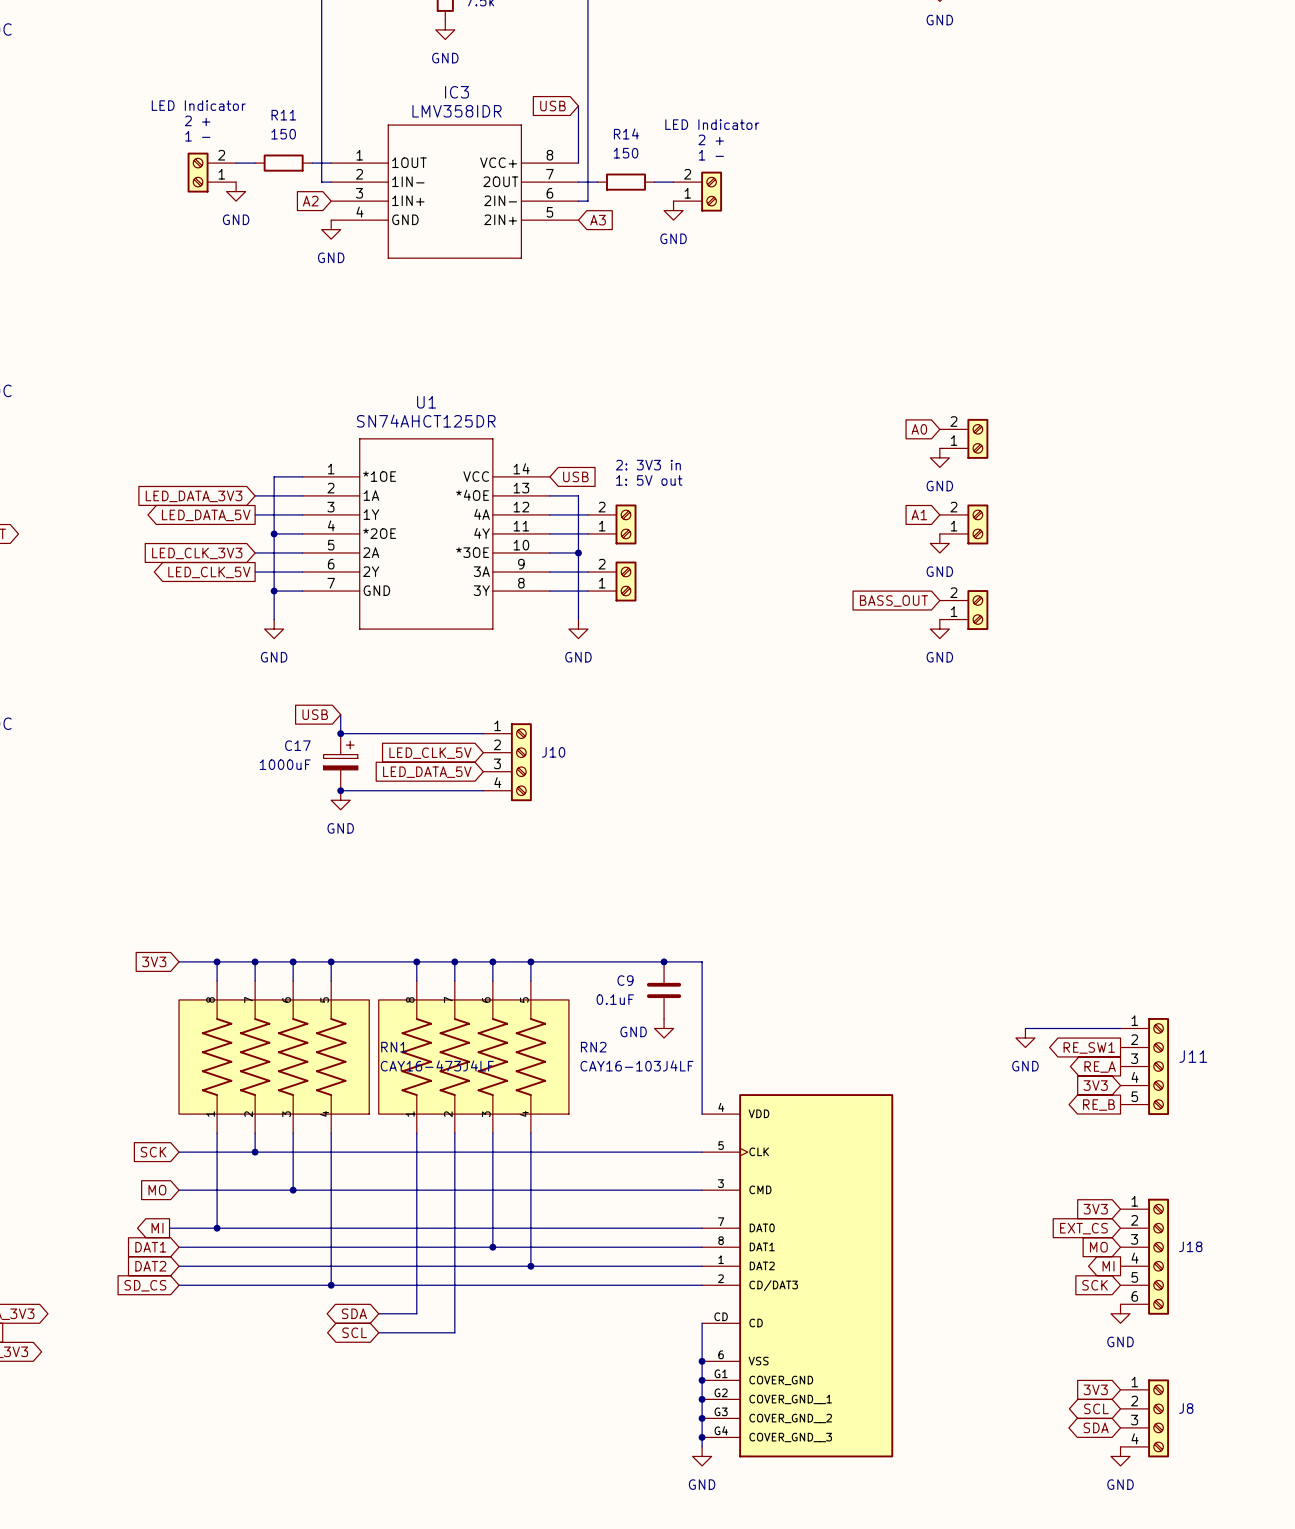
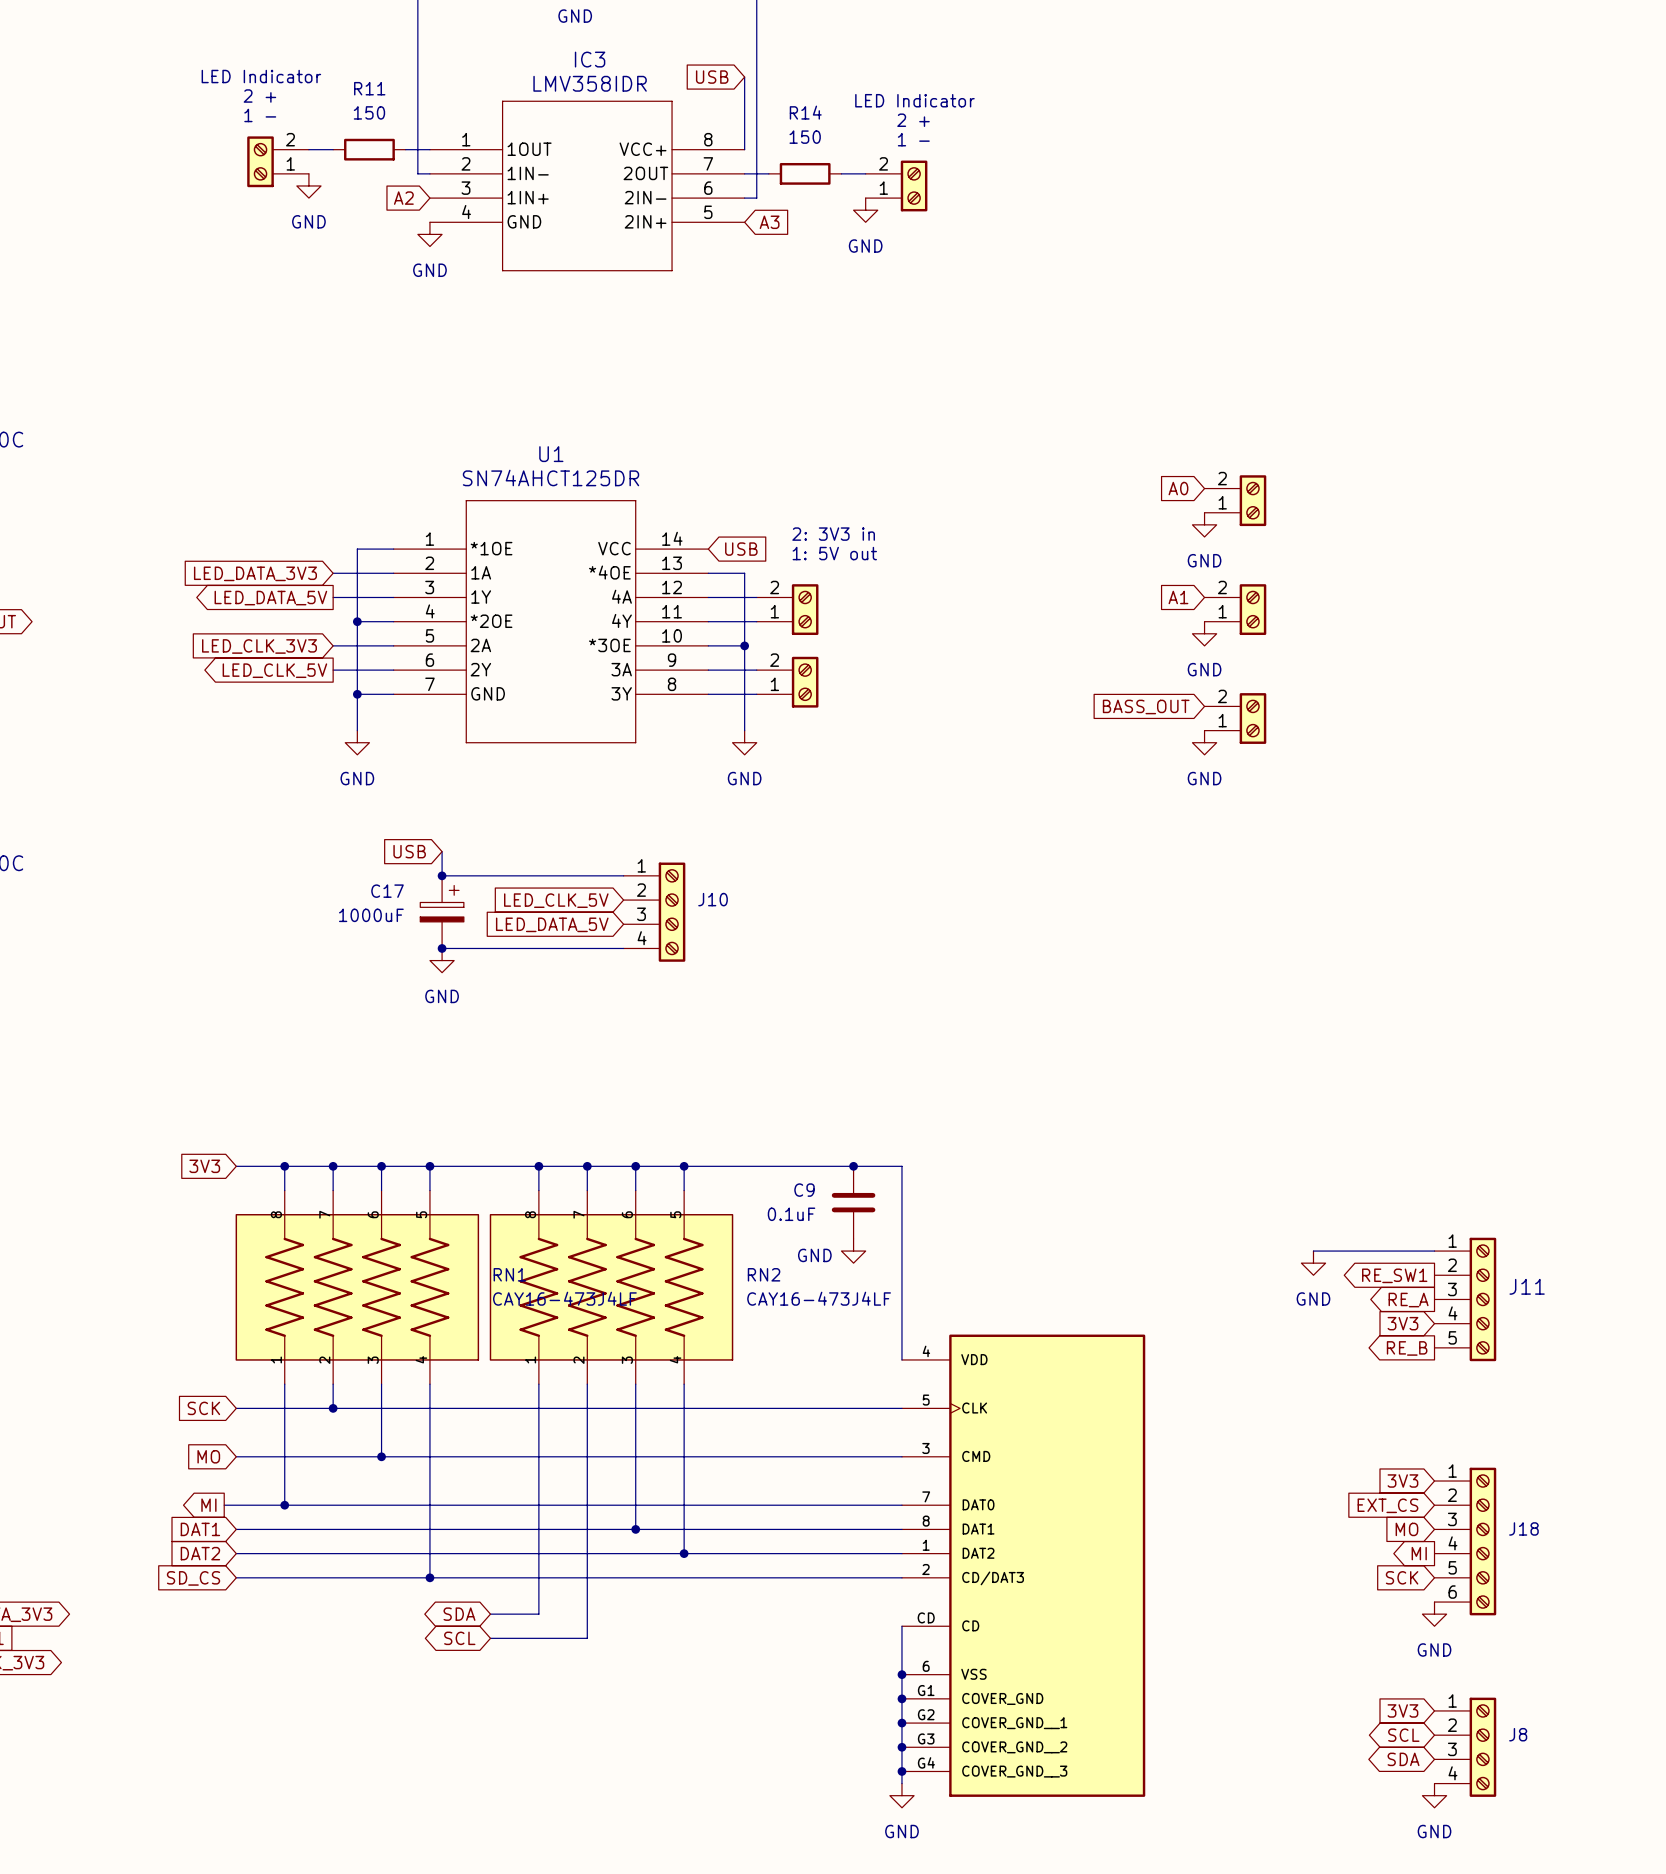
RN2 value: CAY16-103J4LF (636, 1065) -> CAY16-473J4LF (819, 1298)

